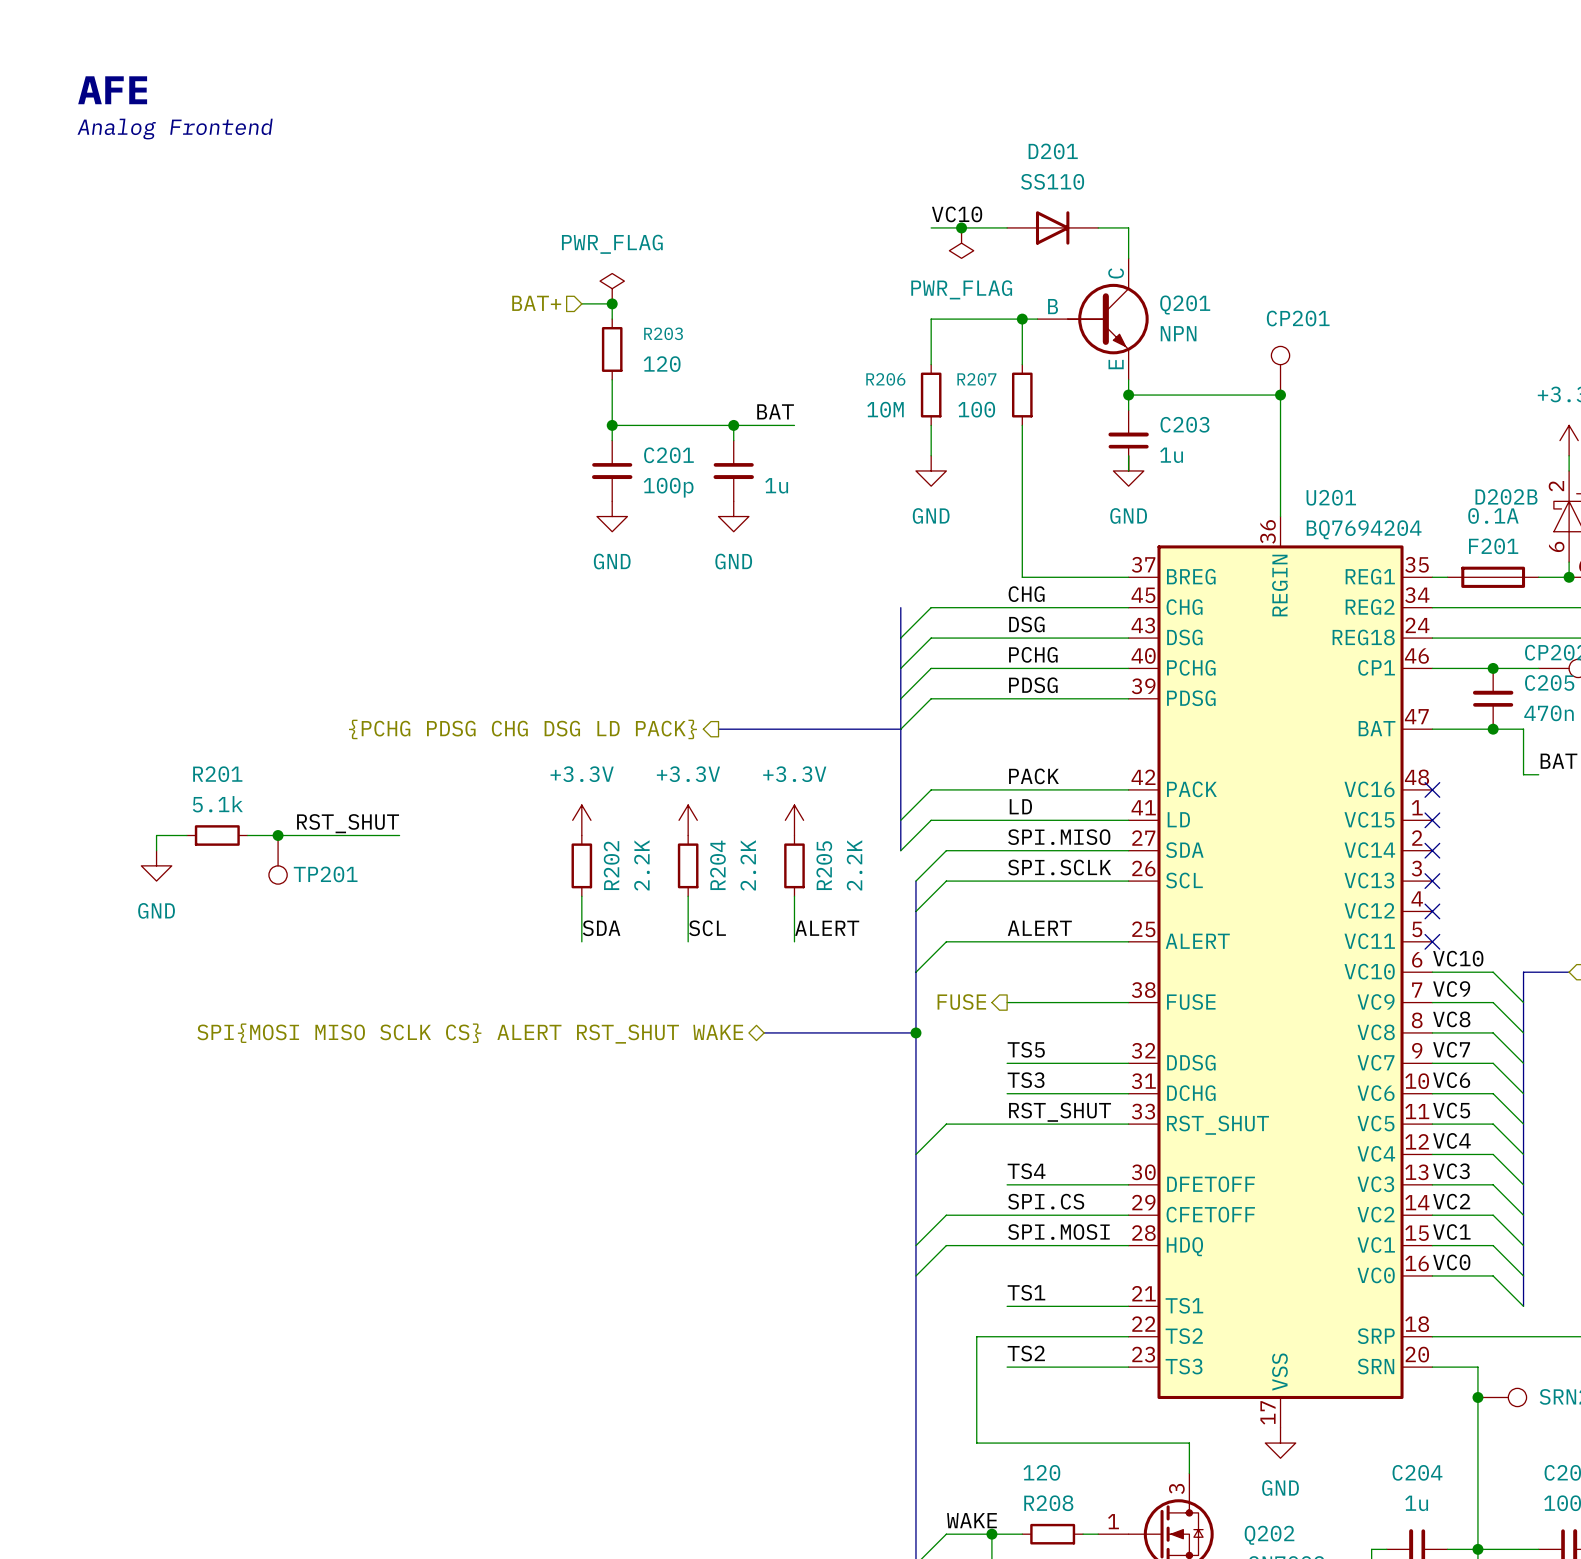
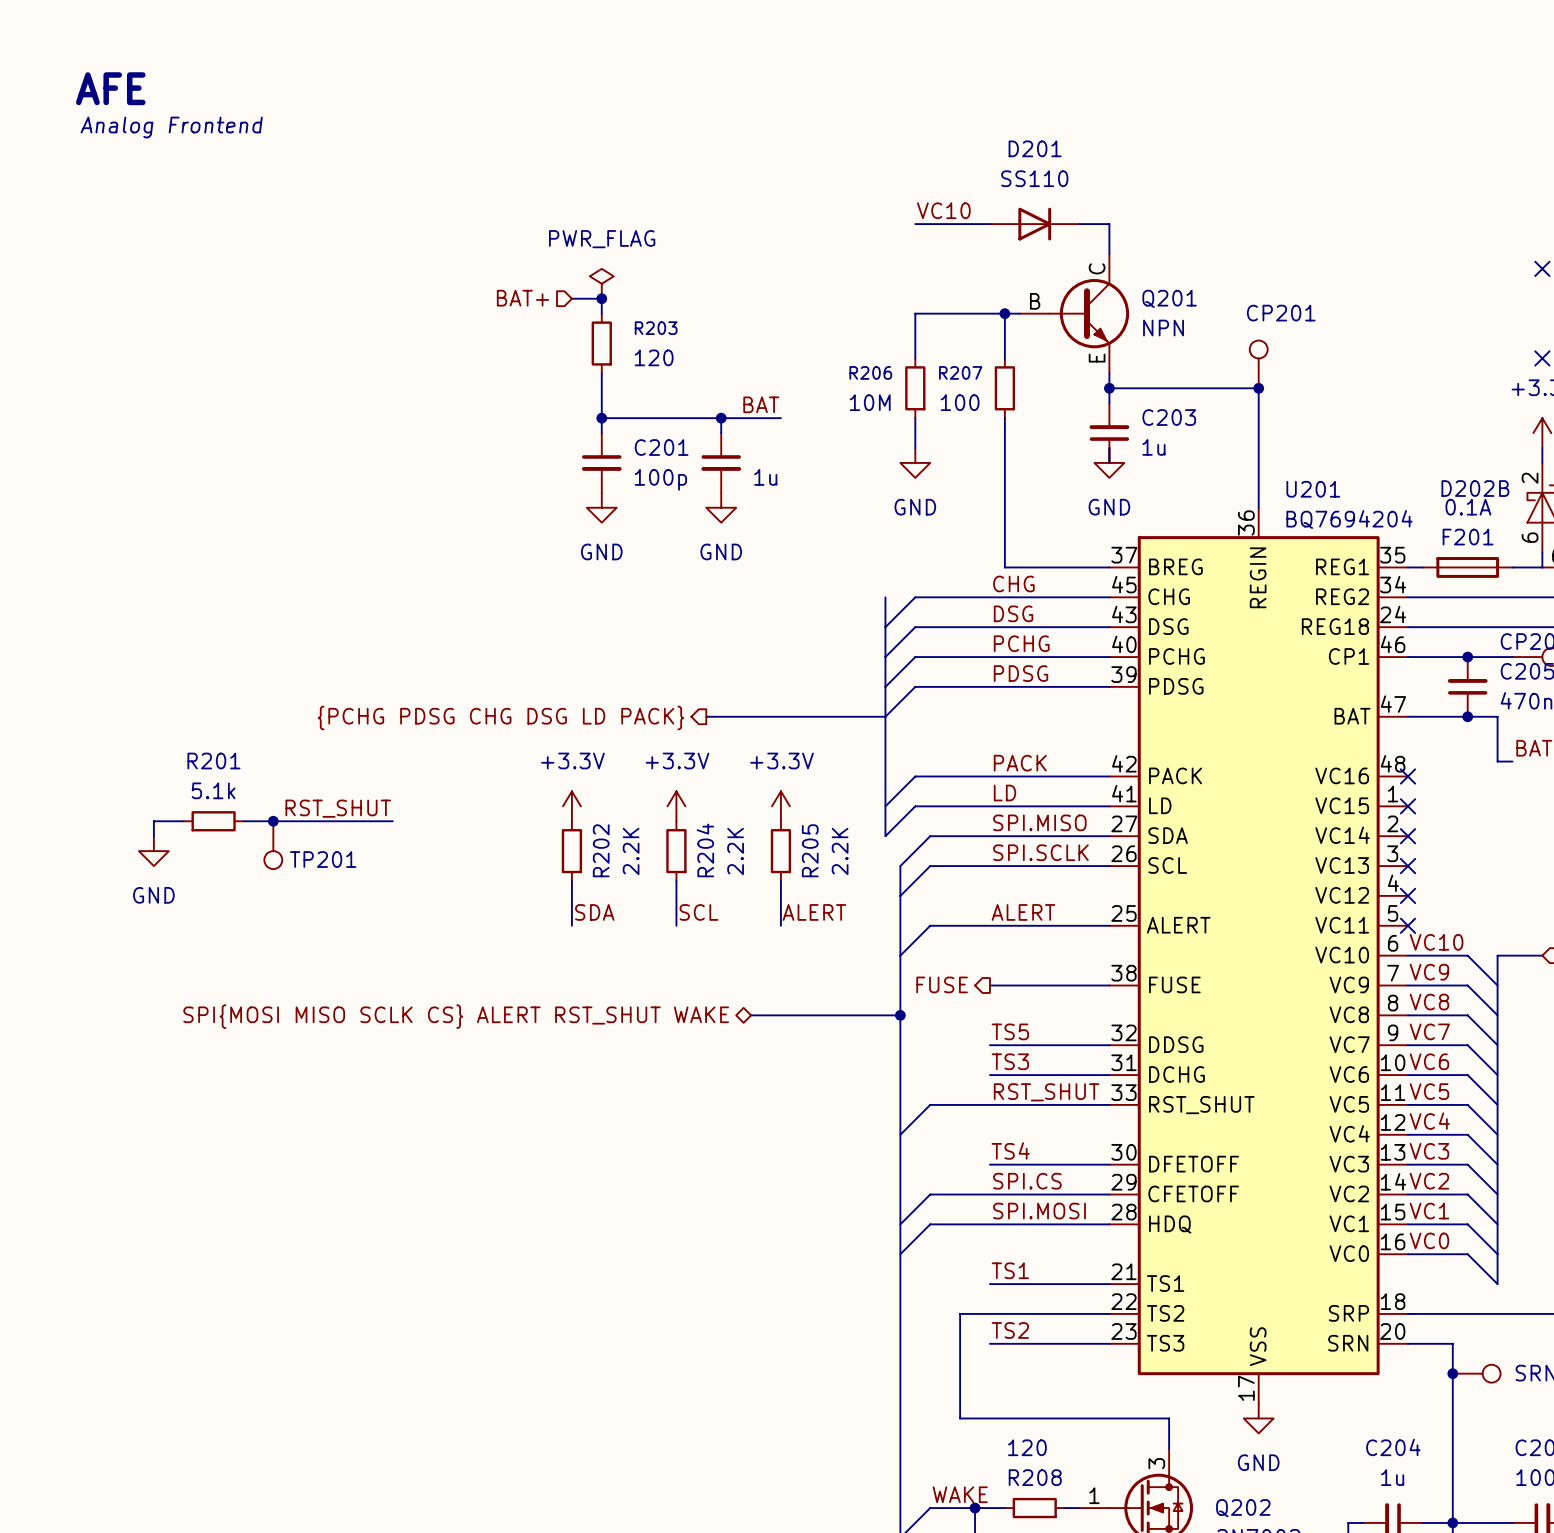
junction: (961, 227) -> none
power symbol: PWR_FLAG (961, 243) -> none
no-connect mark: none -> (1542, 268)
no-connect mark: none -> (1542, 358)
junction: (1569, 577) -> none

